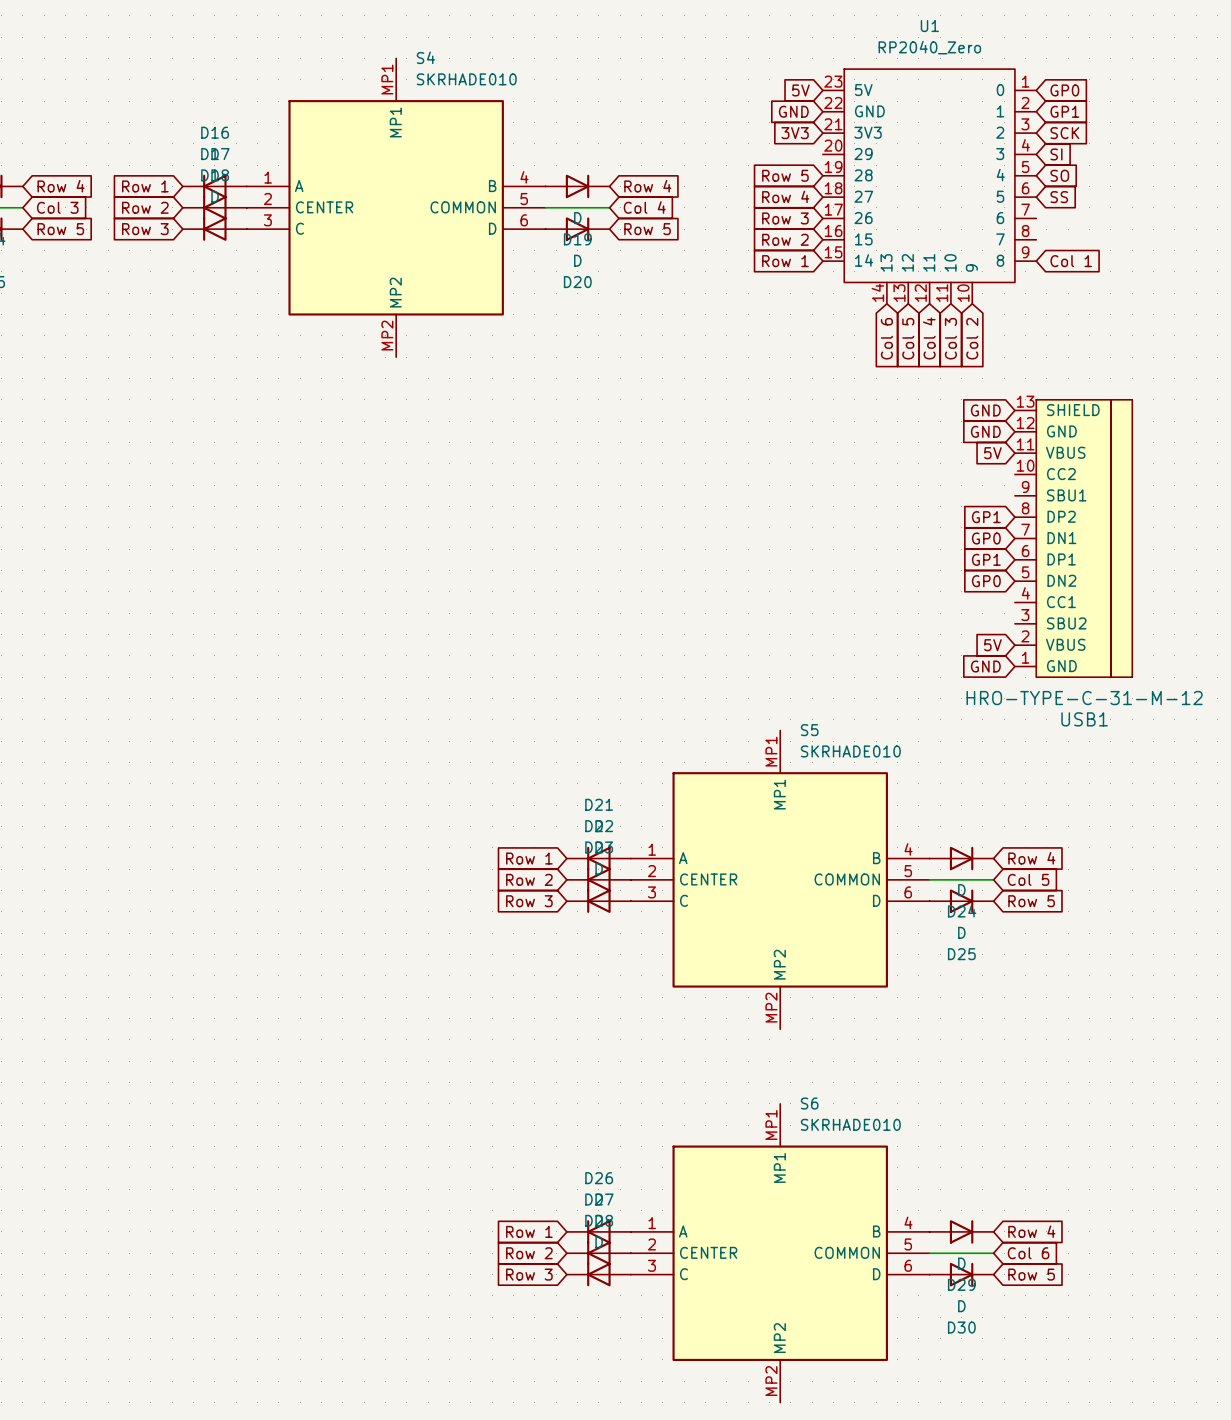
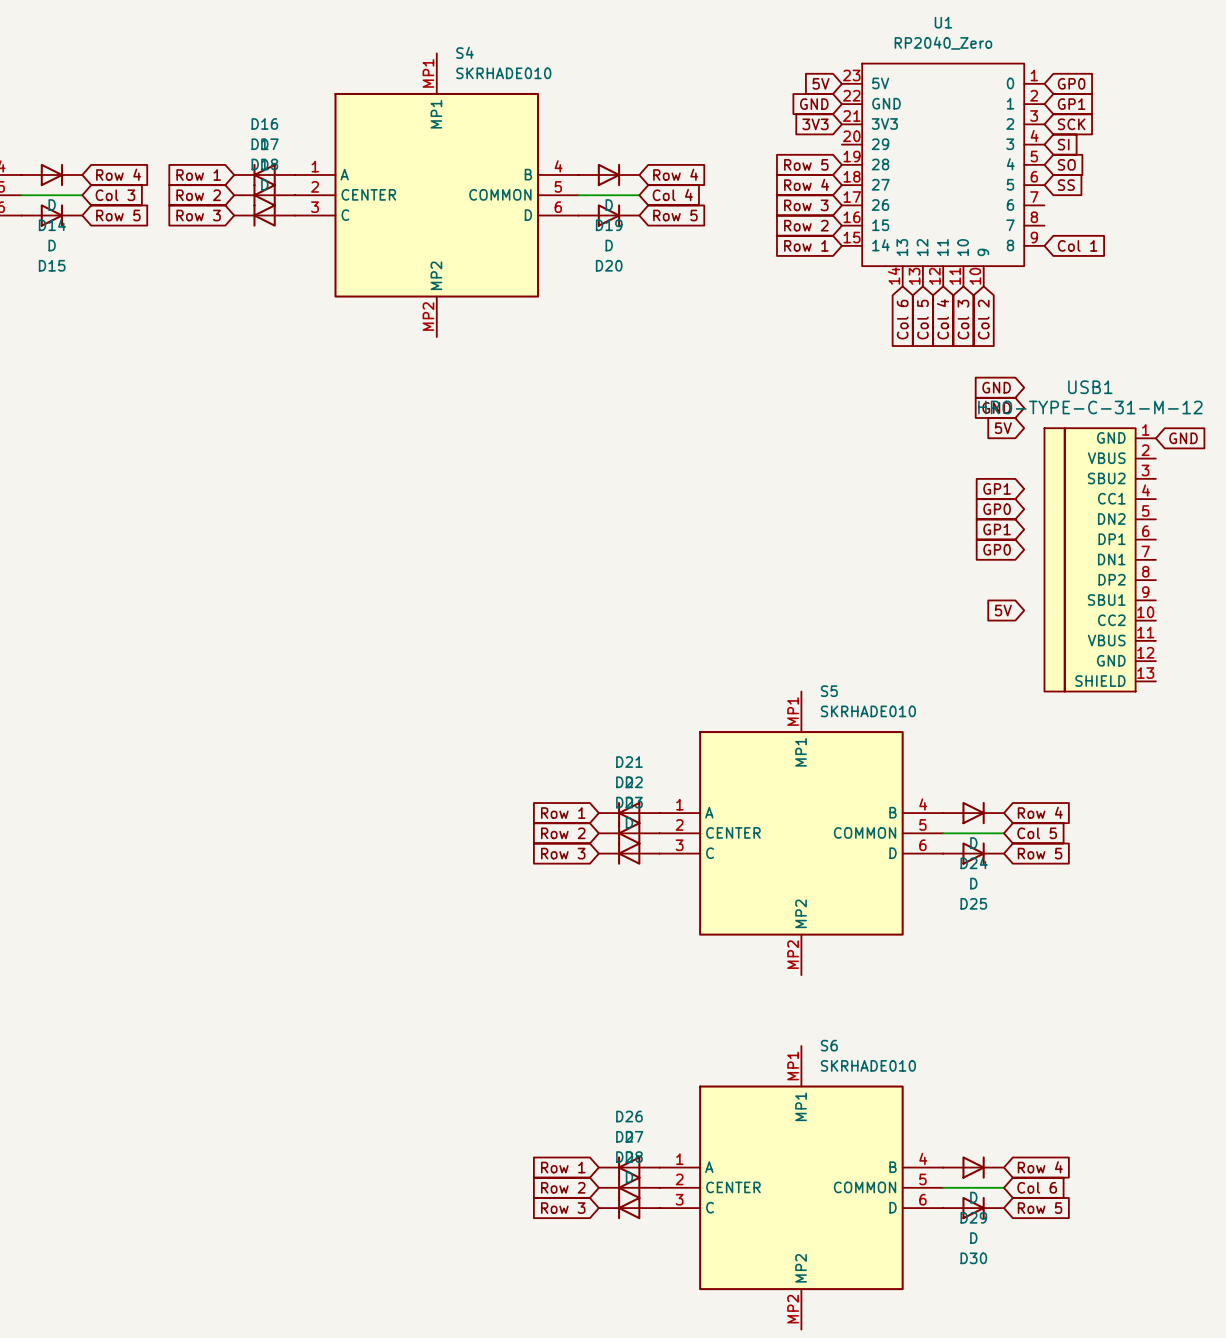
global label: none -> GND (1183, 438)
USB1 rotation: 0° (1084, 538) -> 180° (1090, 559)
global label: GND (985, 666) -> none

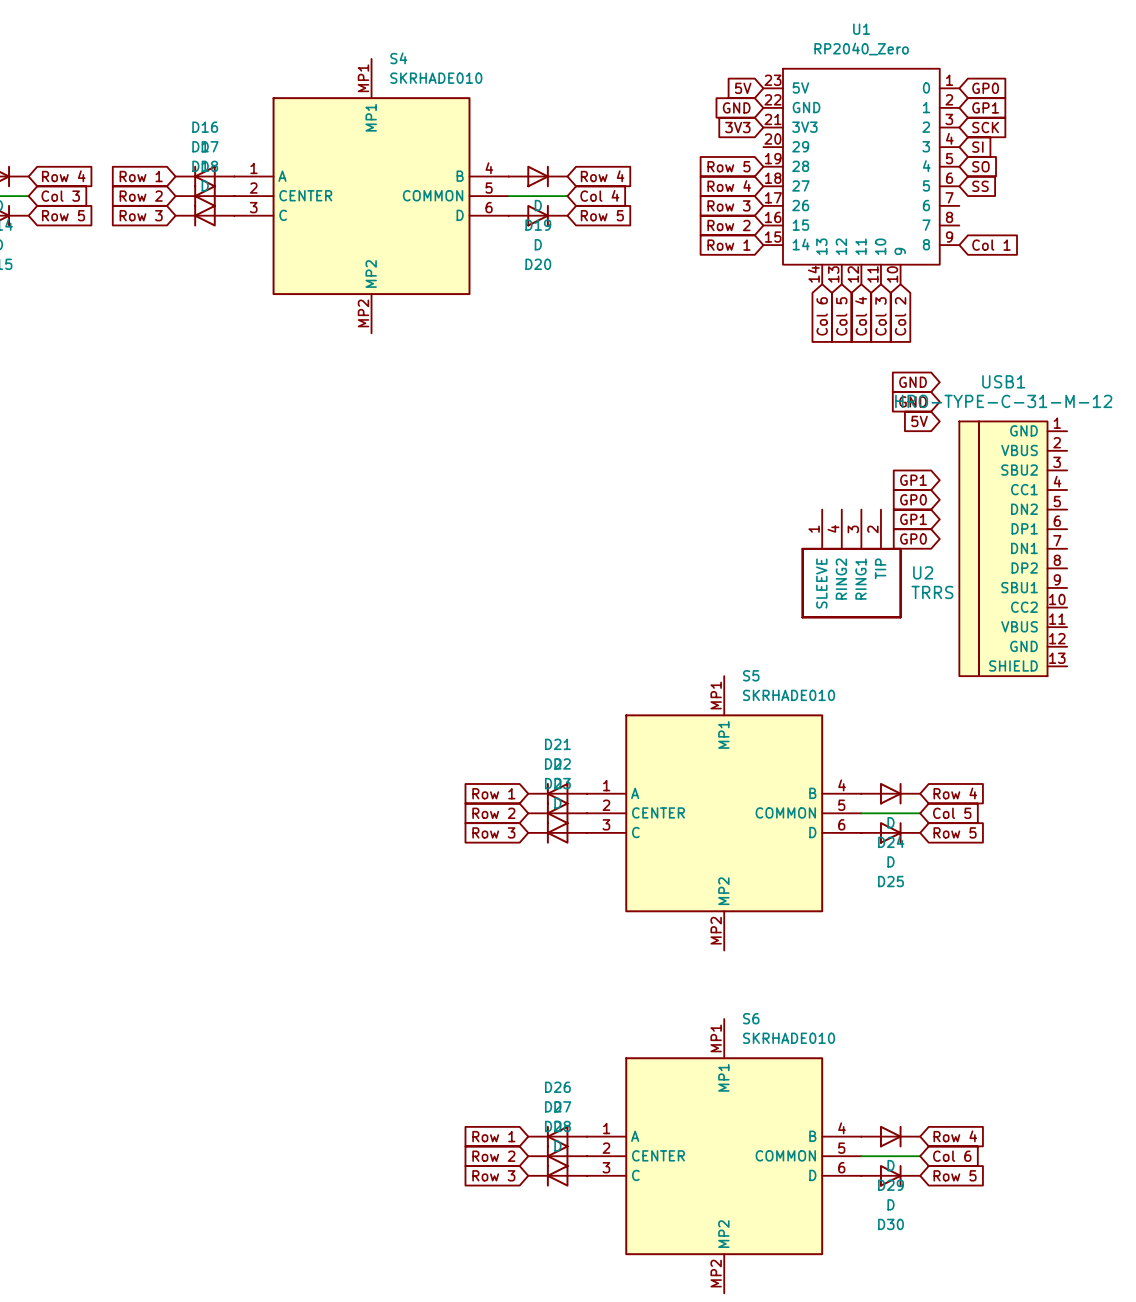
global label: GND (1183, 438) -> none
U2: none -> TRRS (851, 563)
global label: 5V (1003, 610) -> none

